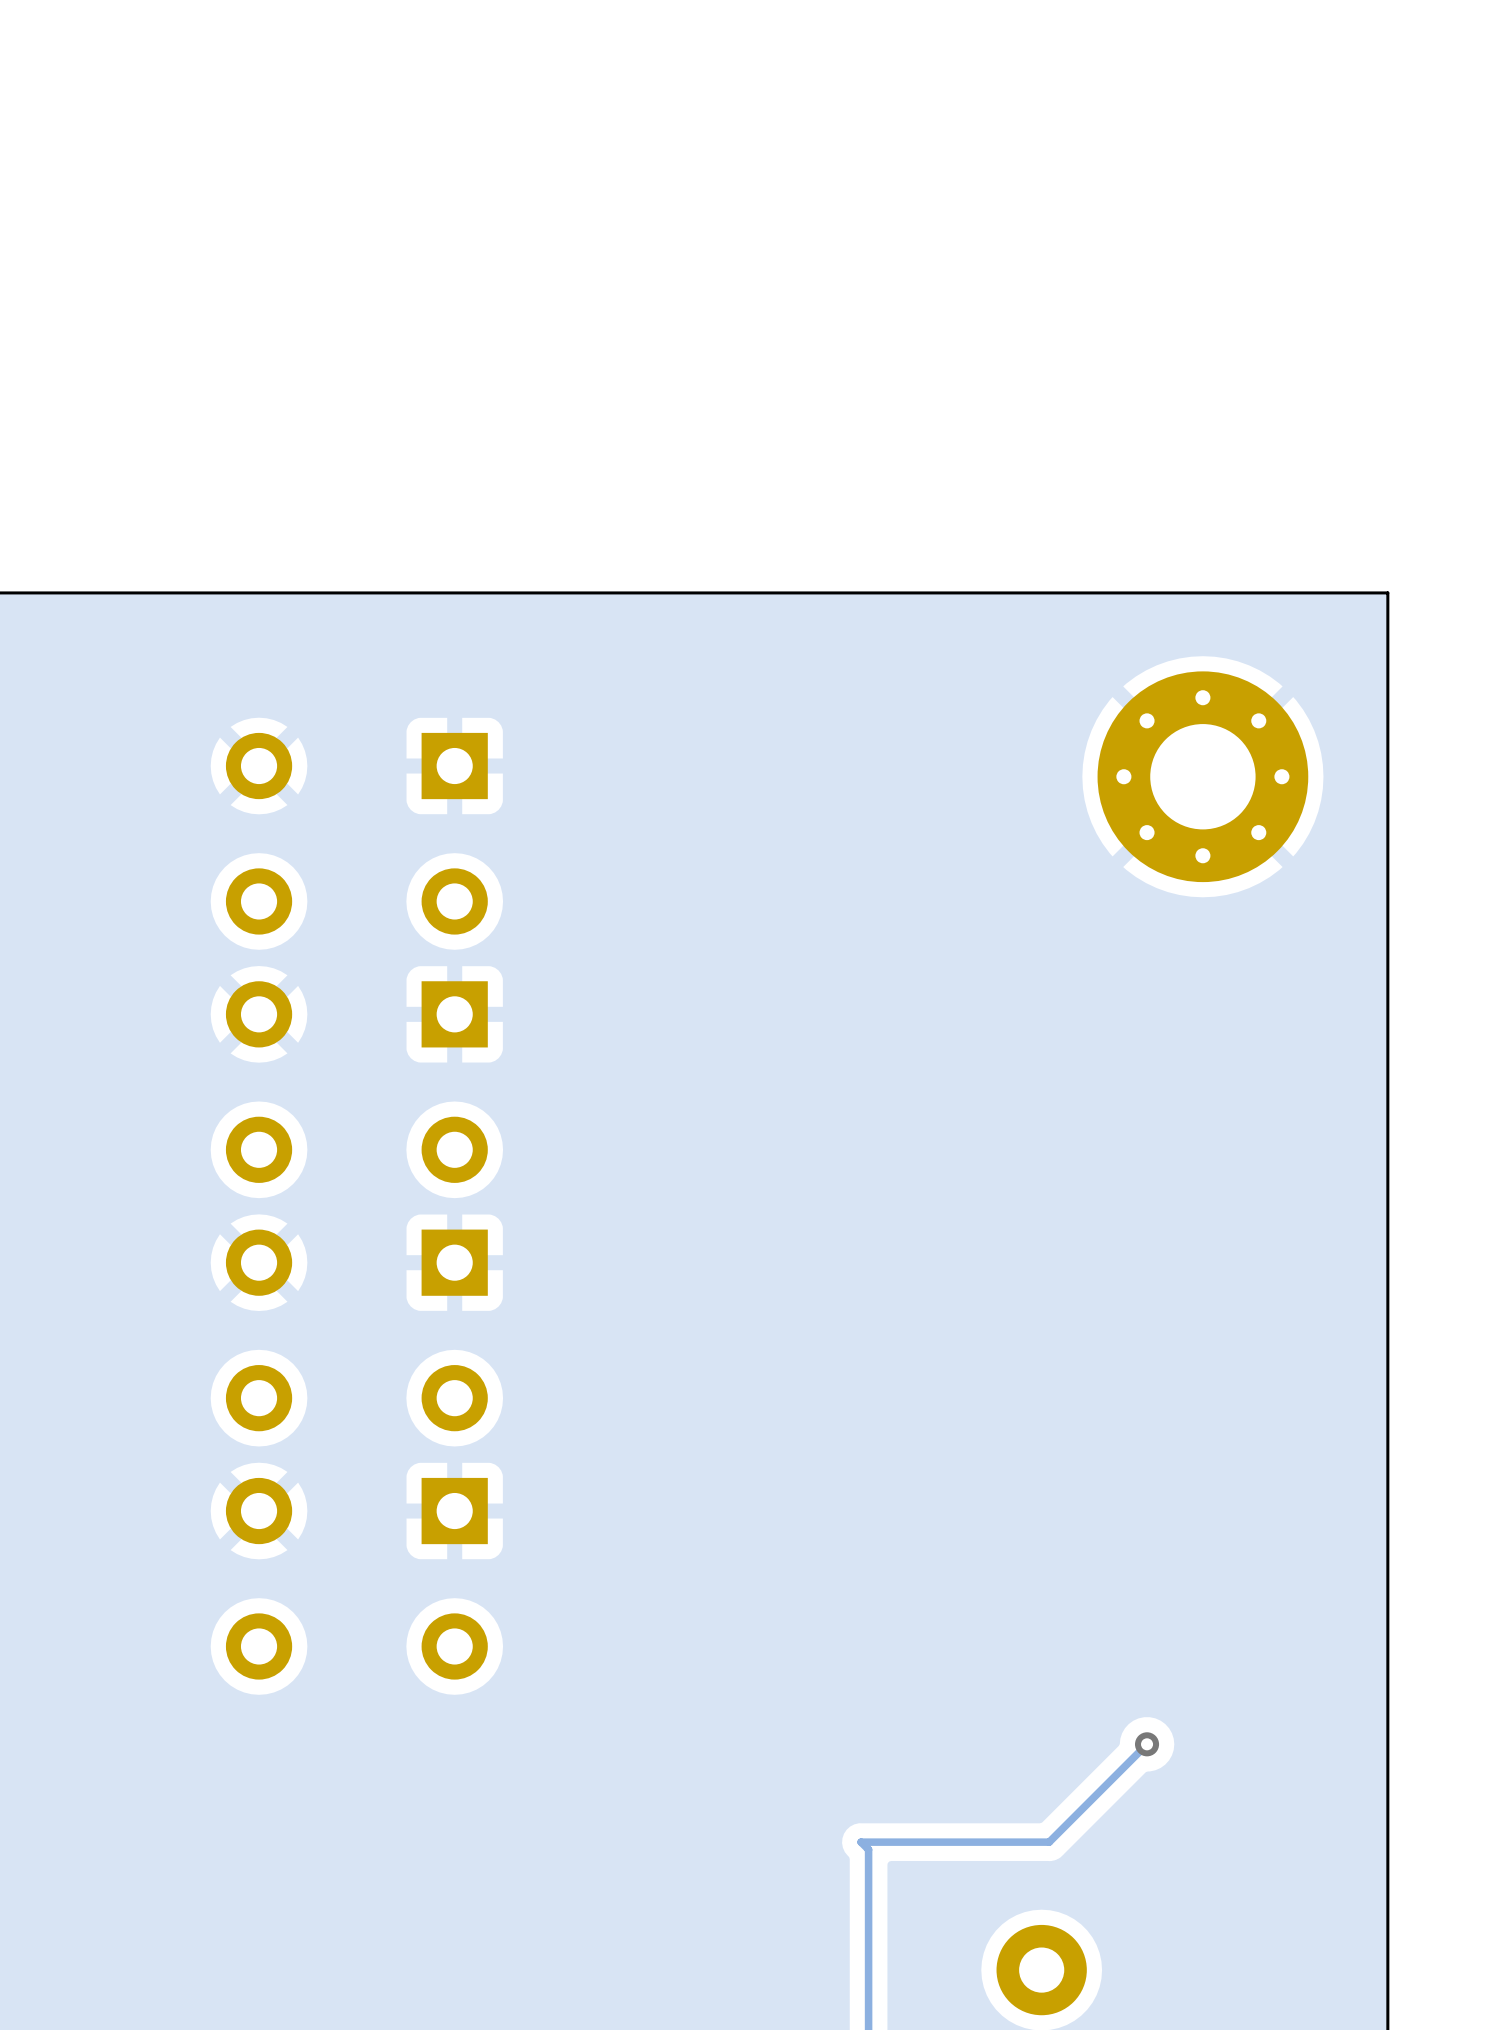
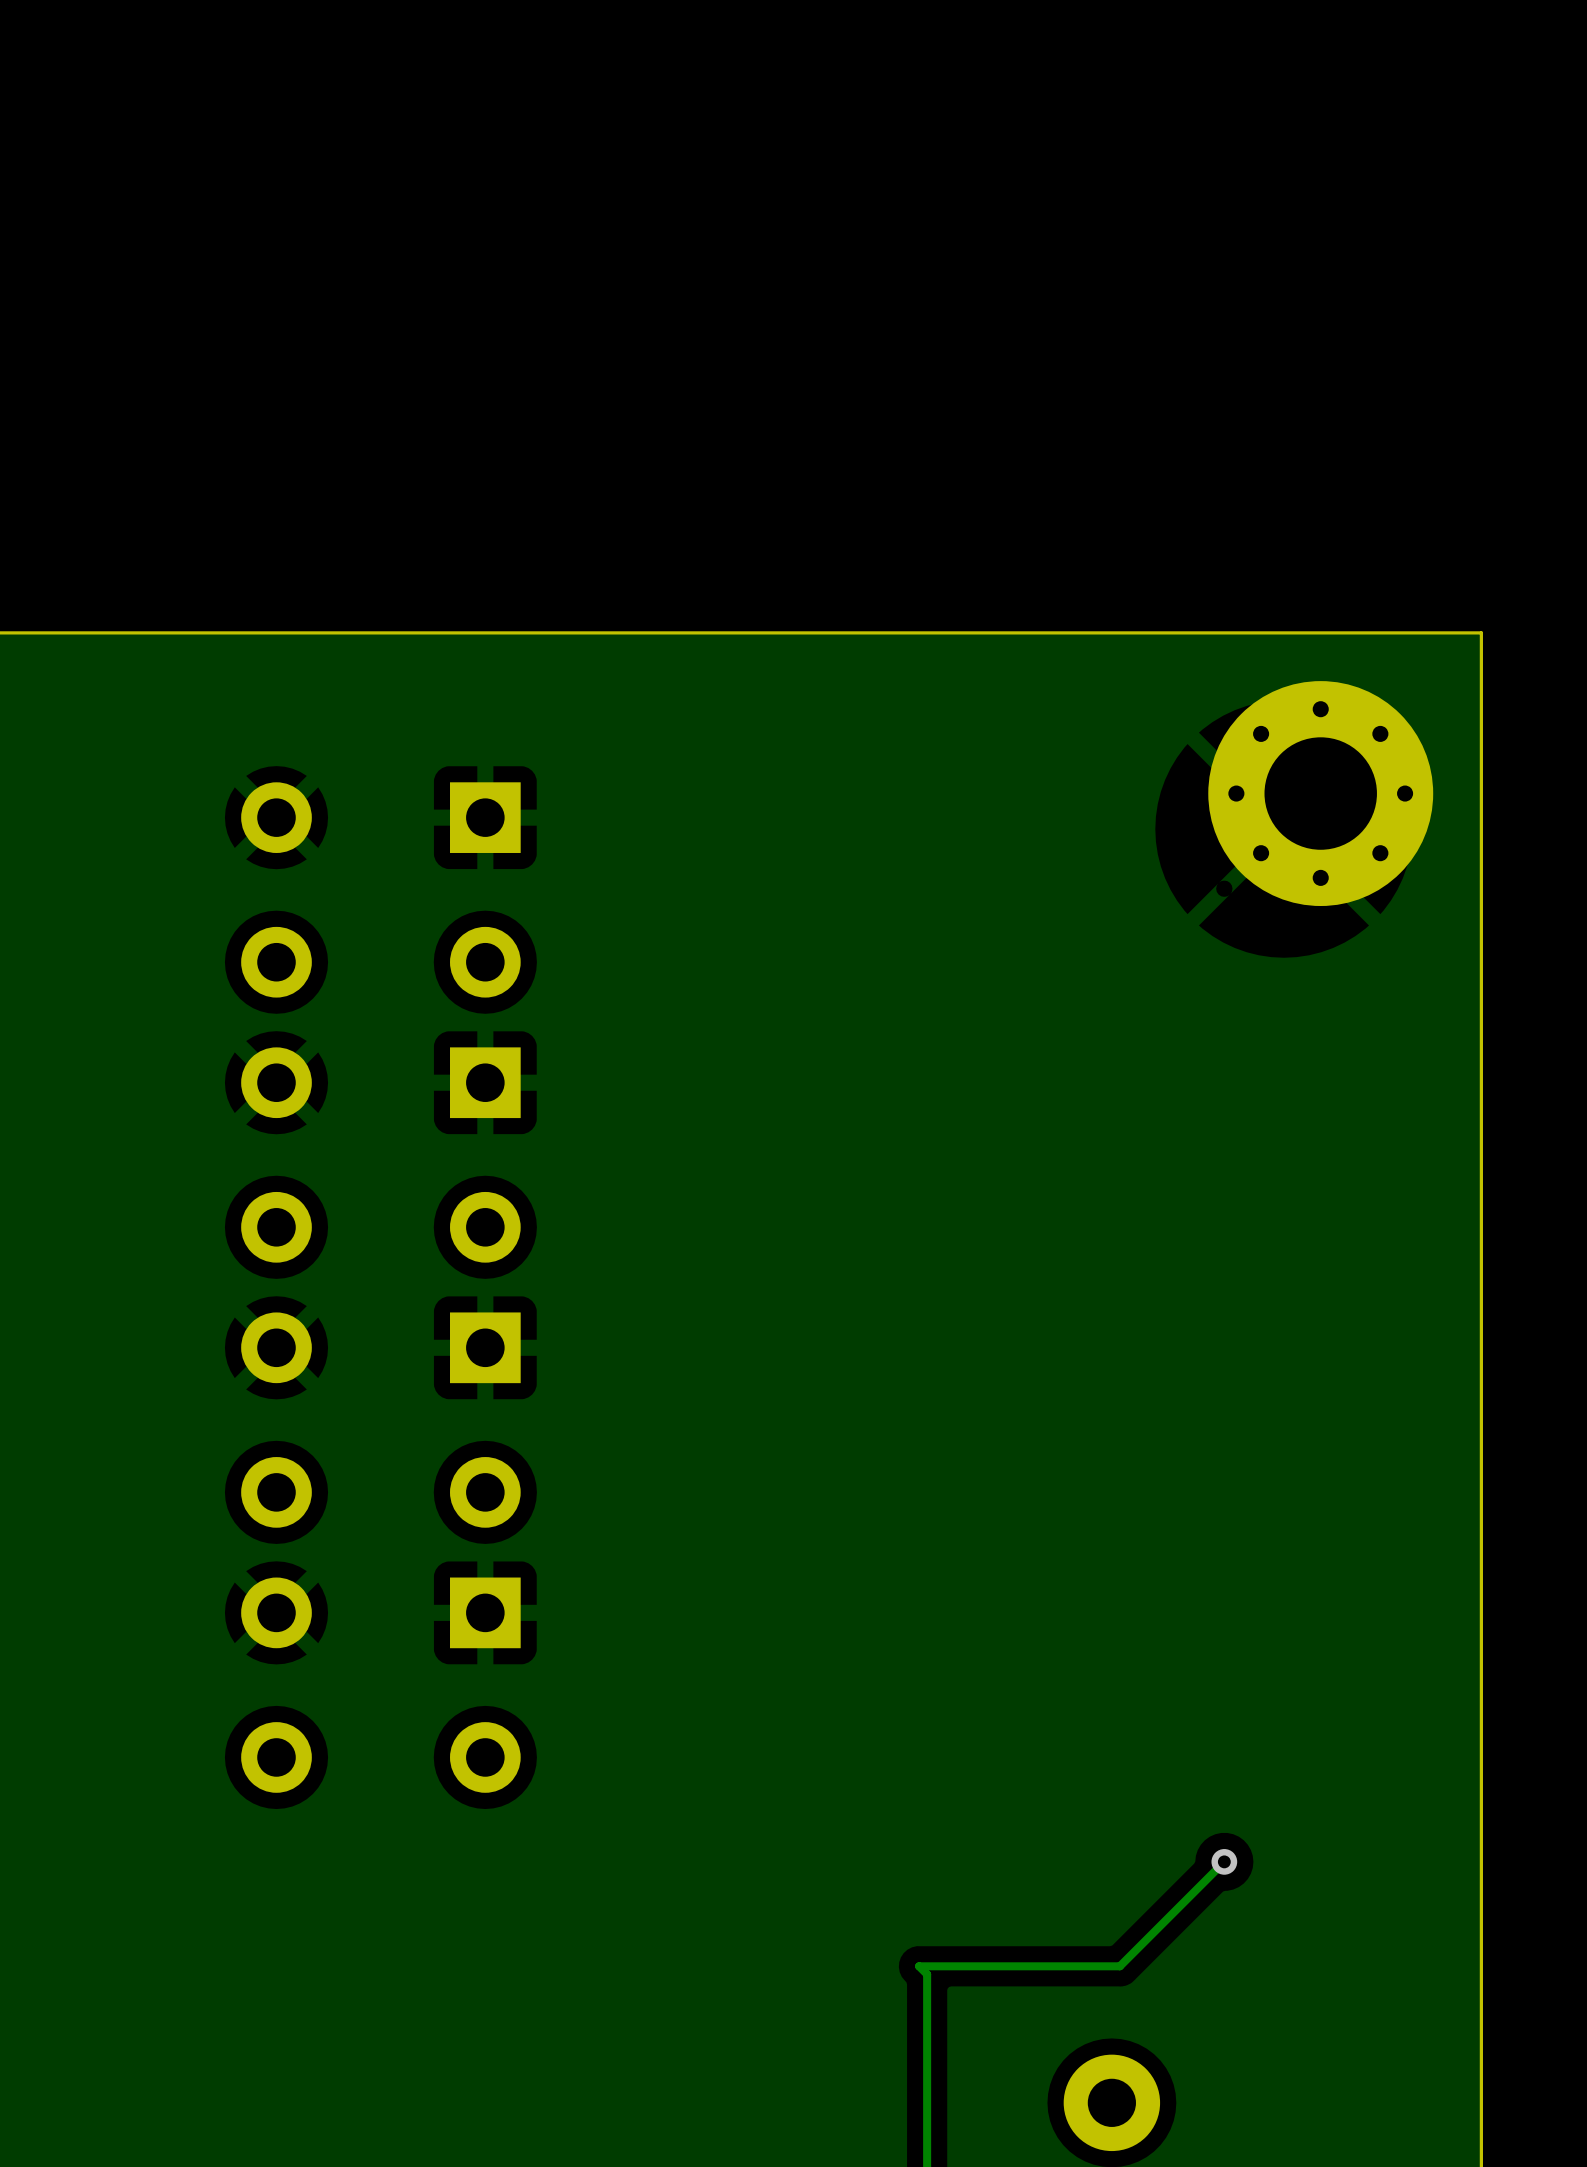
part position: (1202, 776) -> (1320, 793)

